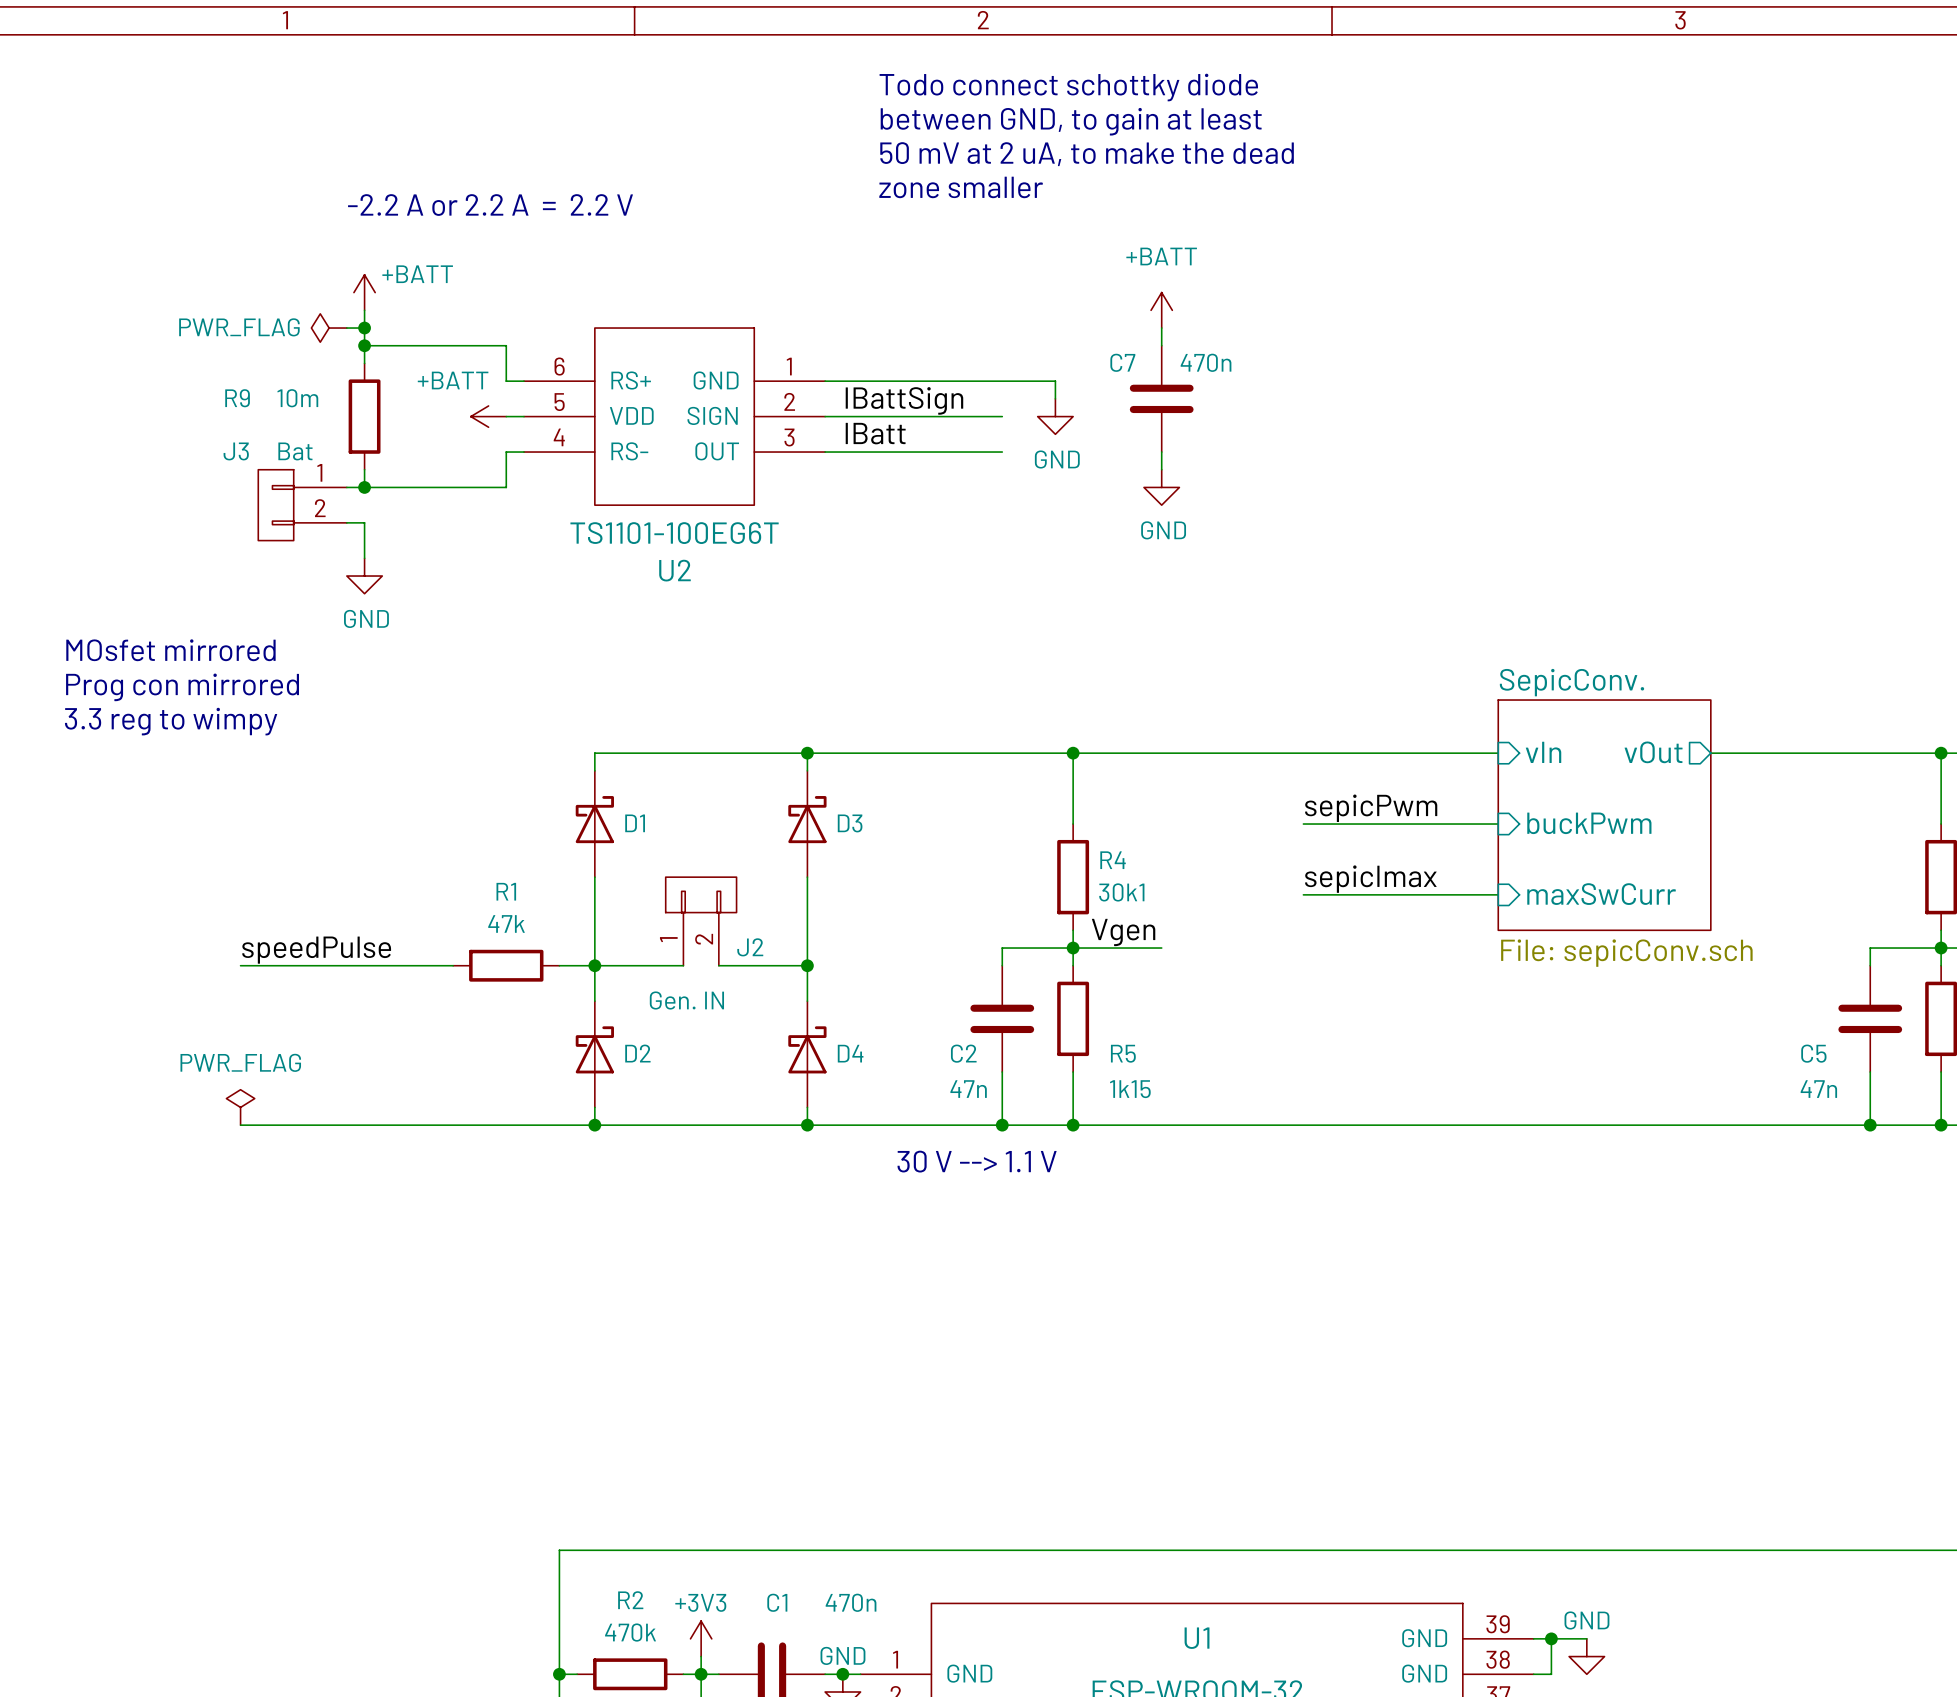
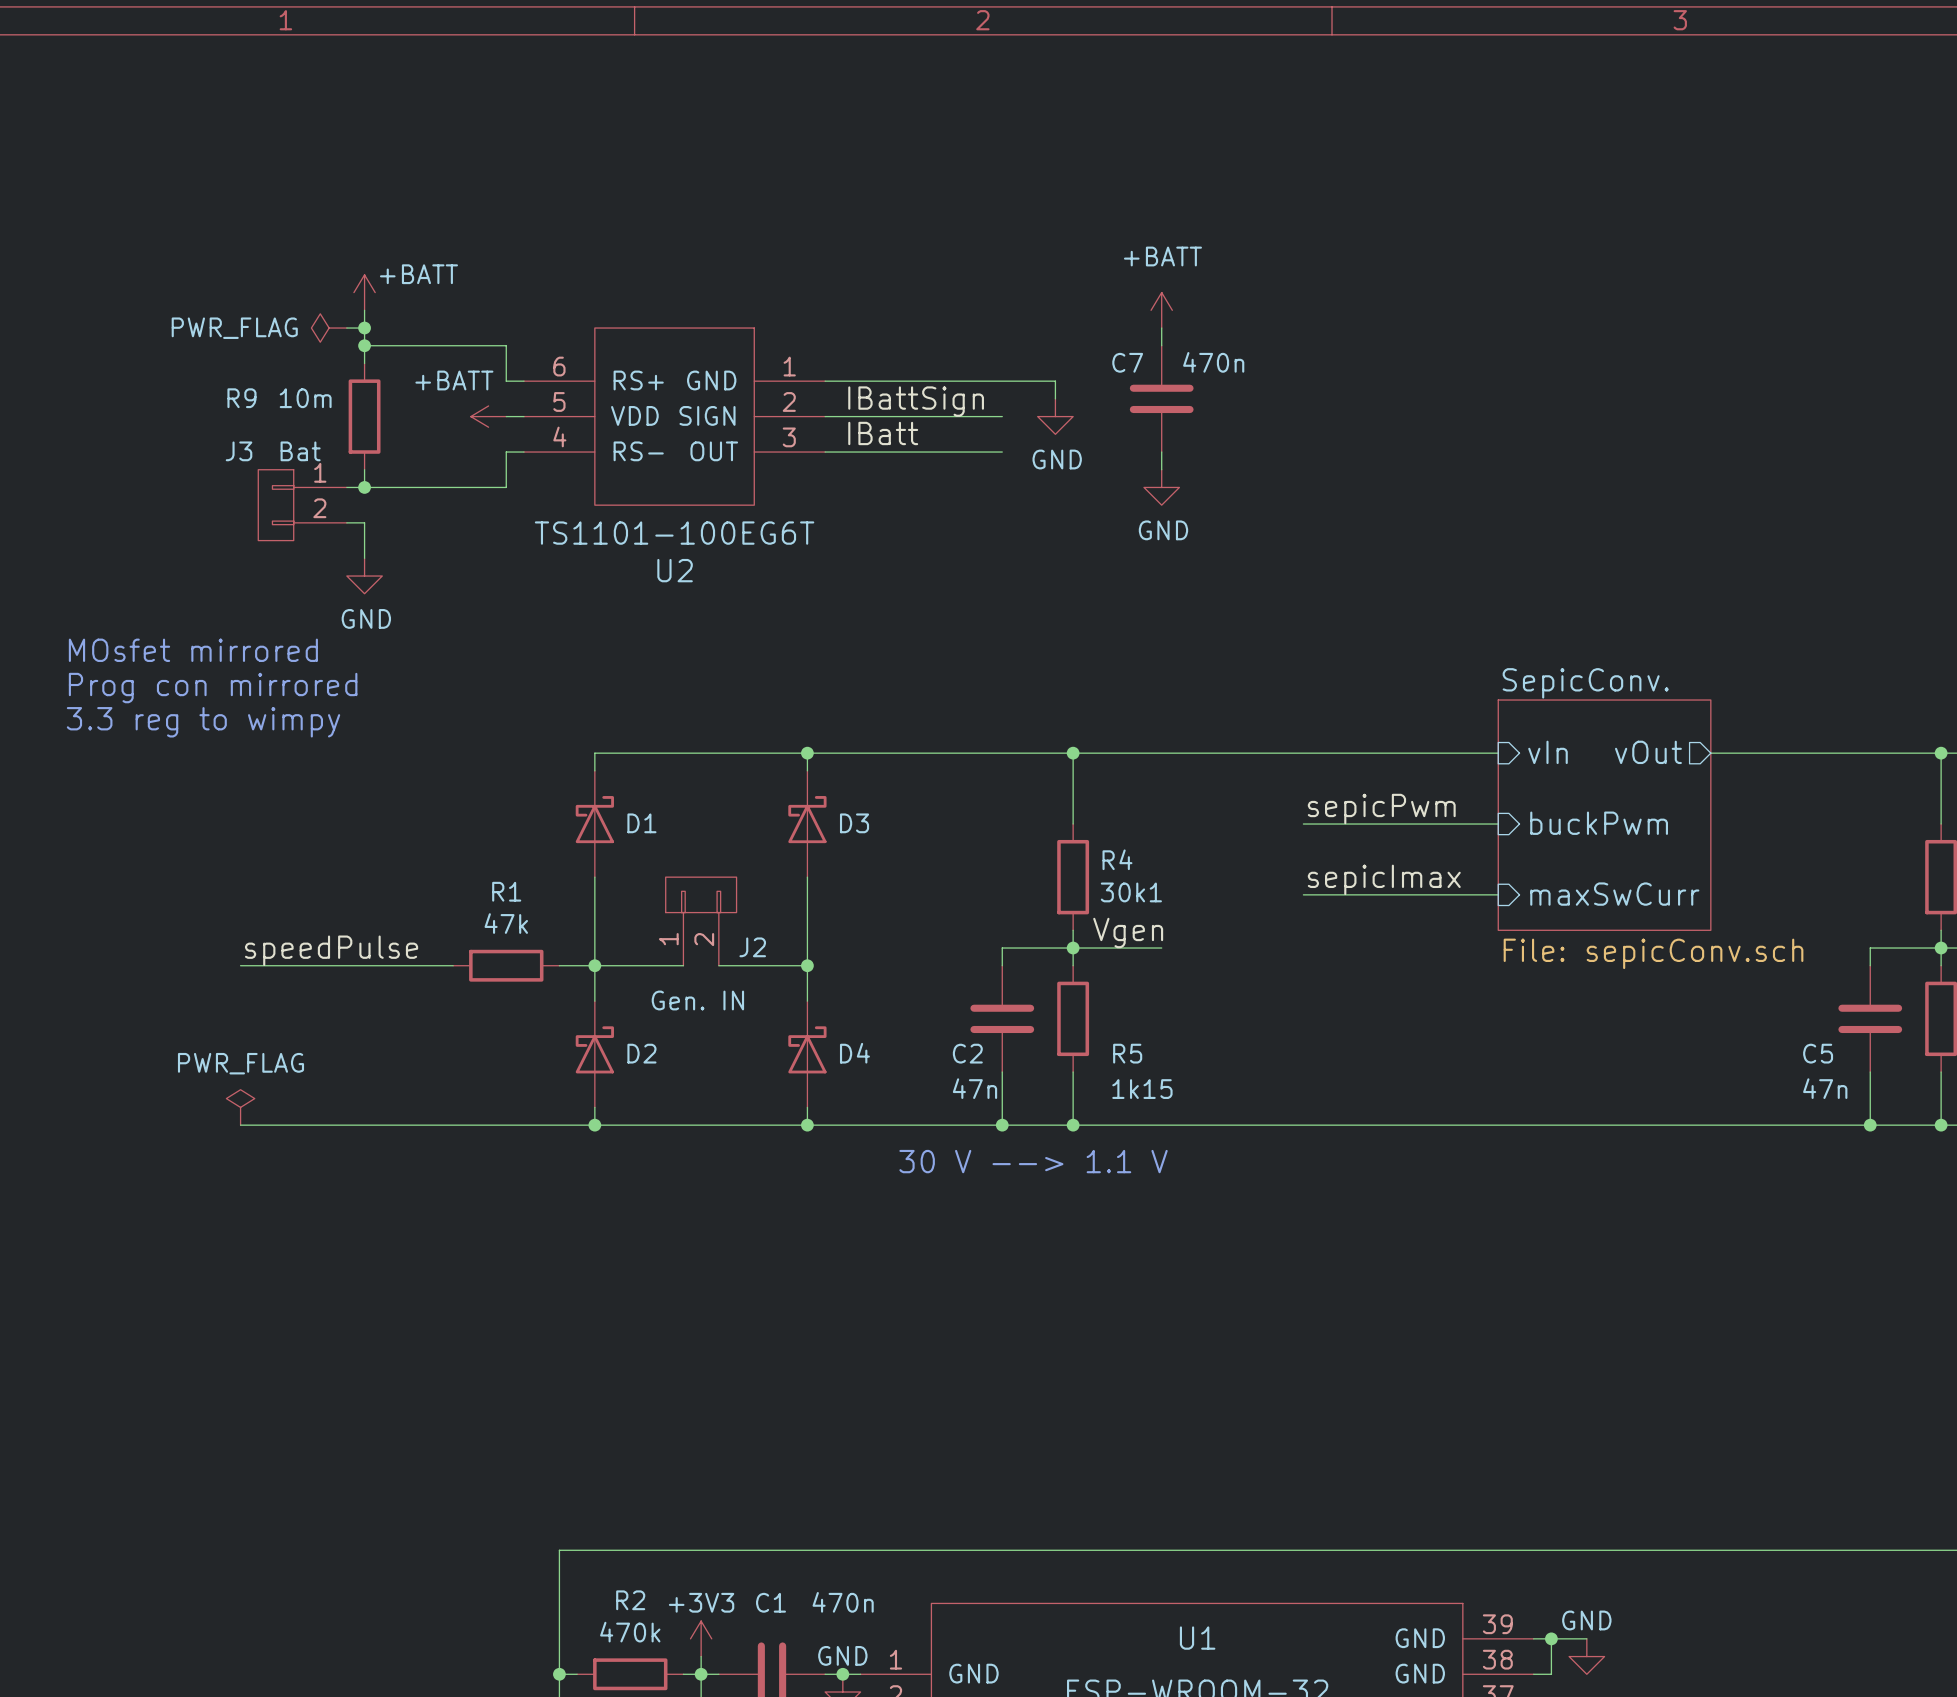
text: Todo connect schottky diode (1068, 87) -> none
text: between GND, to gain at least (1071, 121) -> none
text: 50 mV at 2 uA, to make the dead (1087, 154) -> none
text: zone smaller (961, 187) -> none
text: -2.2 A or 2.2 A = 2.2 V (490, 205) -> none

